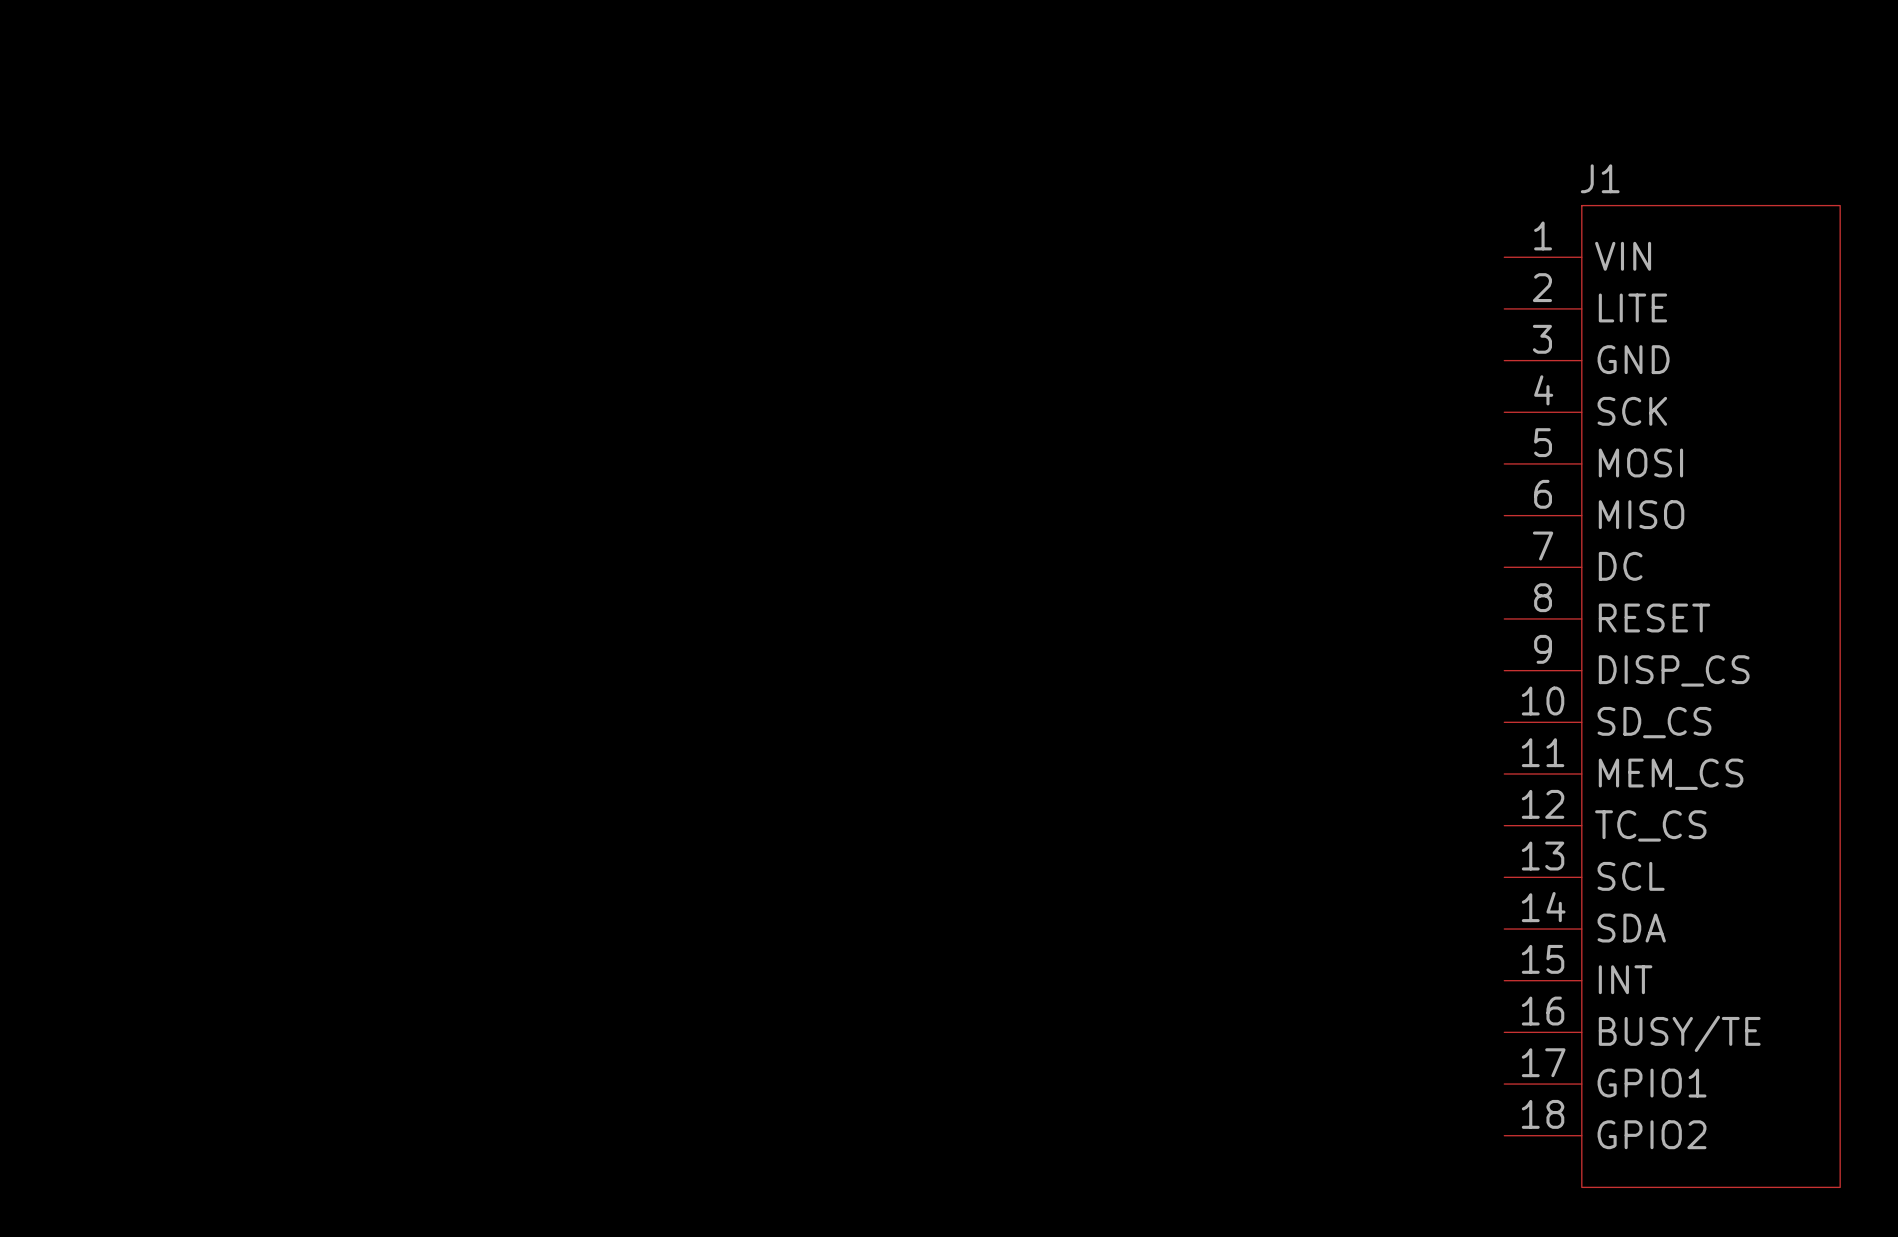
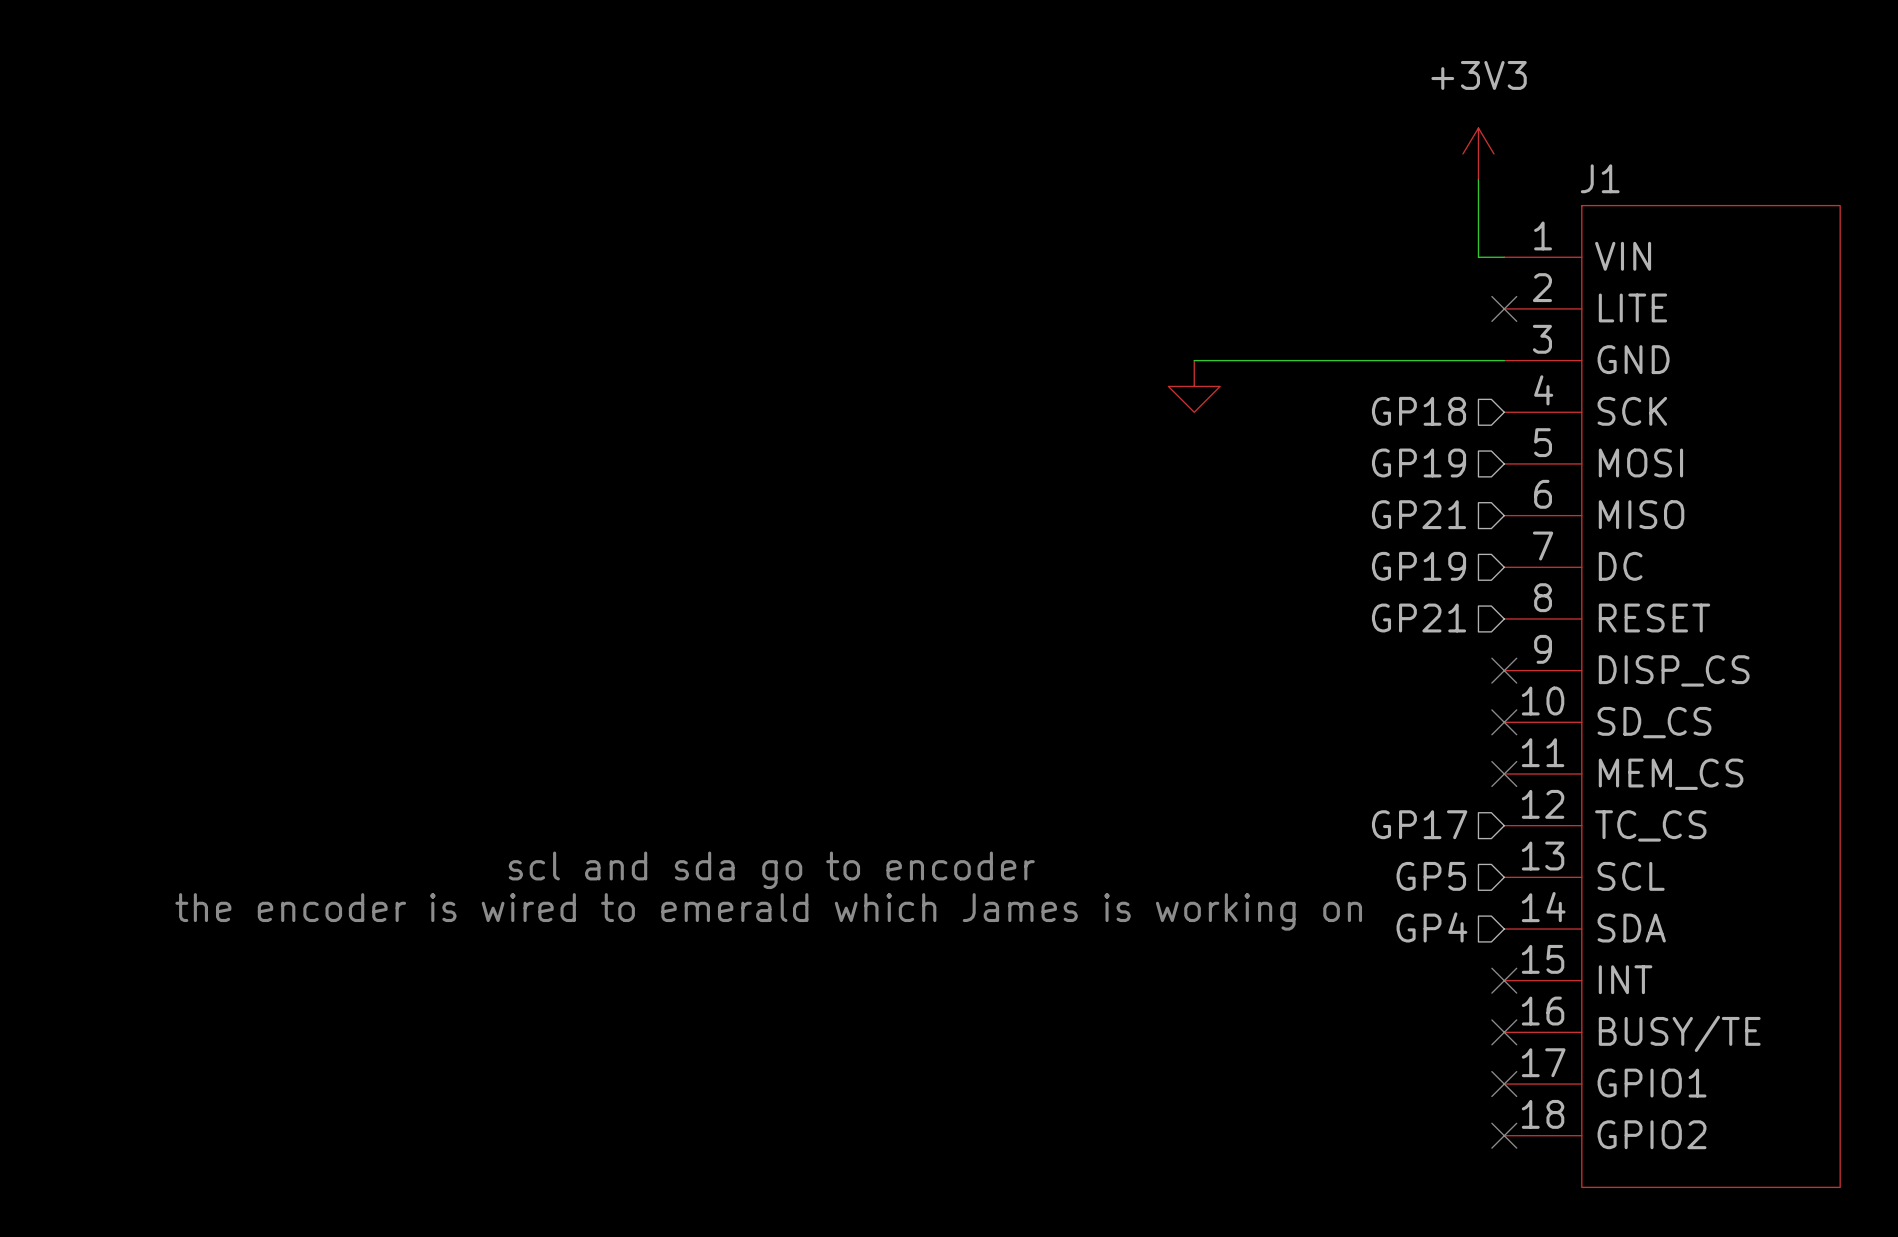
power symbol: none -> +3V3 (1478, 153)
wire: none -> (1478, 179) (1478, 257) (1504, 257)
no-connect mark: none -> (1504, 308)
wire: none -> (1194, 360) (1504, 360)
power symbol: none -> (1194, 386)
hierarchical label: none -> GP18 (1419, 411)
hierarchical label: none -> GP19 (1419, 462)
hierarchical label: none -> GP21 (1419, 514)
hierarchical label: none -> GP19 (1419, 566)
hierarchical label: none -> GP21 (1419, 618)
no-connect mark: none -> (1504, 670)
no-connect mark: none -> (1504, 722)
no-connect mark: none -> (1504, 773)
hierarchical label: none -> GP17 (1419, 824)
text: none -> scl and sda go to encoder (771, 870)
hierarchical label: none -> GP5 (1431, 876)
text: none -> the encoder is wired to emerald which James is working on (768, 911)
hierarchical label: none -> GP4 (1431, 927)
no-connect mark: none -> (1504, 980)
no-connect mark: none -> (1504, 1032)
no-connect mark: none -> (1504, 1084)
no-connect mark: none -> (1504, 1135)

